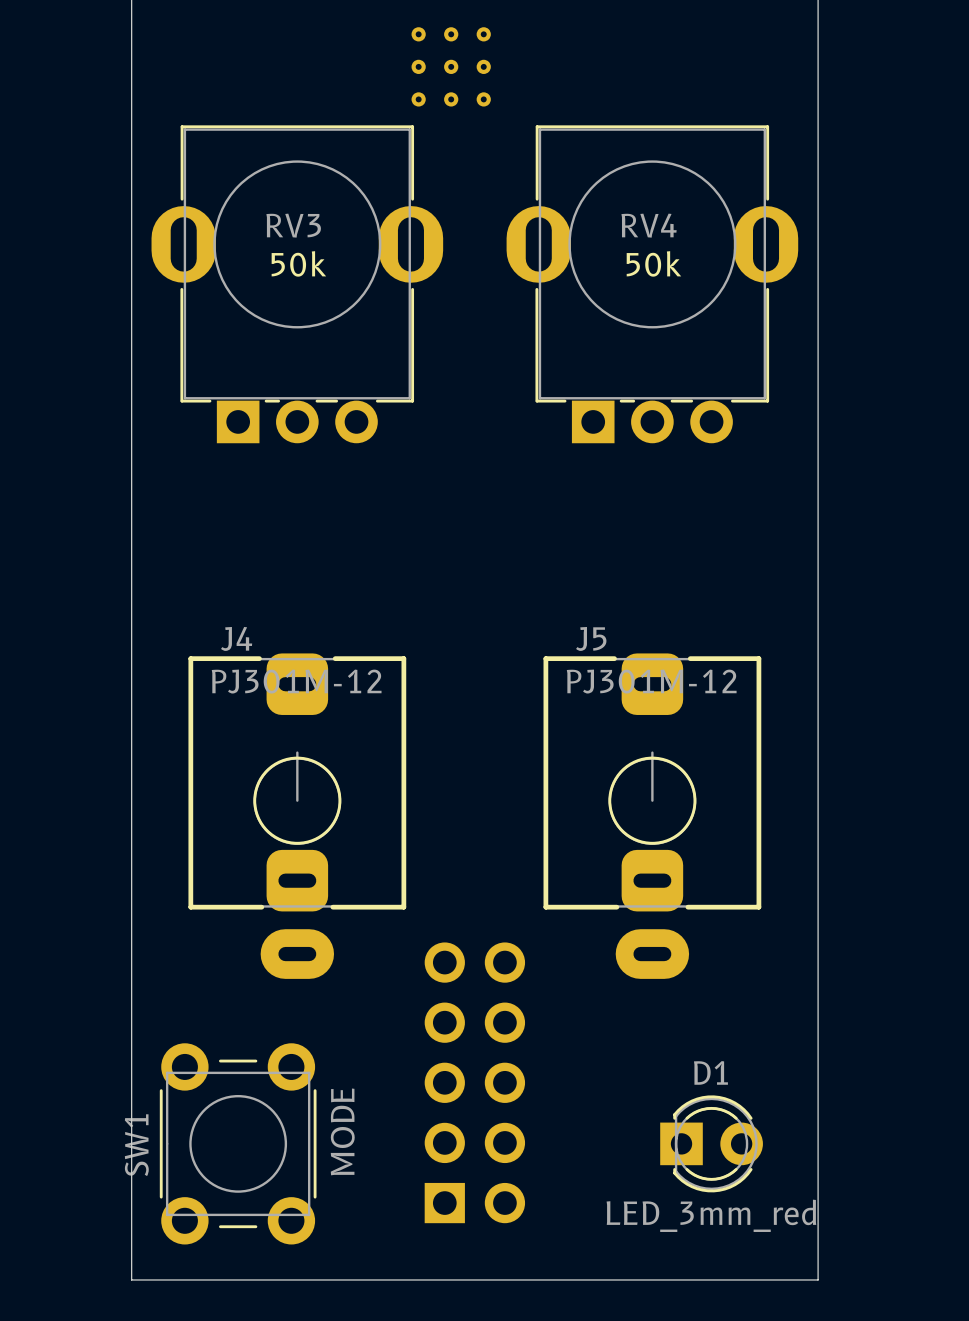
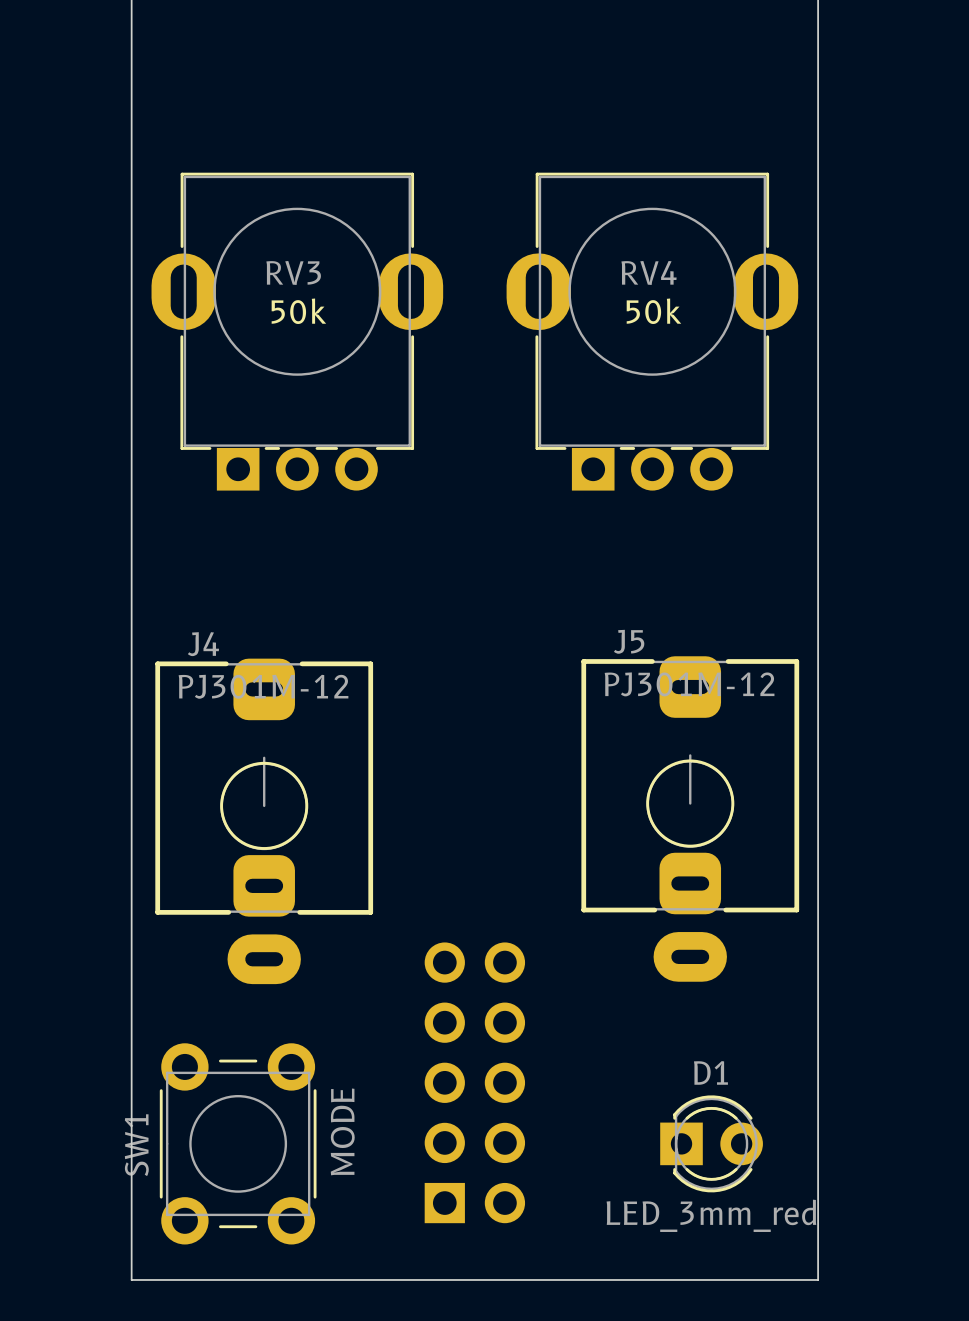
part: (451, 66) -> none
RV3 position: (297, 284) -> (297, 331)
RV4 position: (652, 284) -> (652, 331)
J4 position: (297, 816) -> (264, 821)
J5 position: (652, 816) -> (690, 819)

